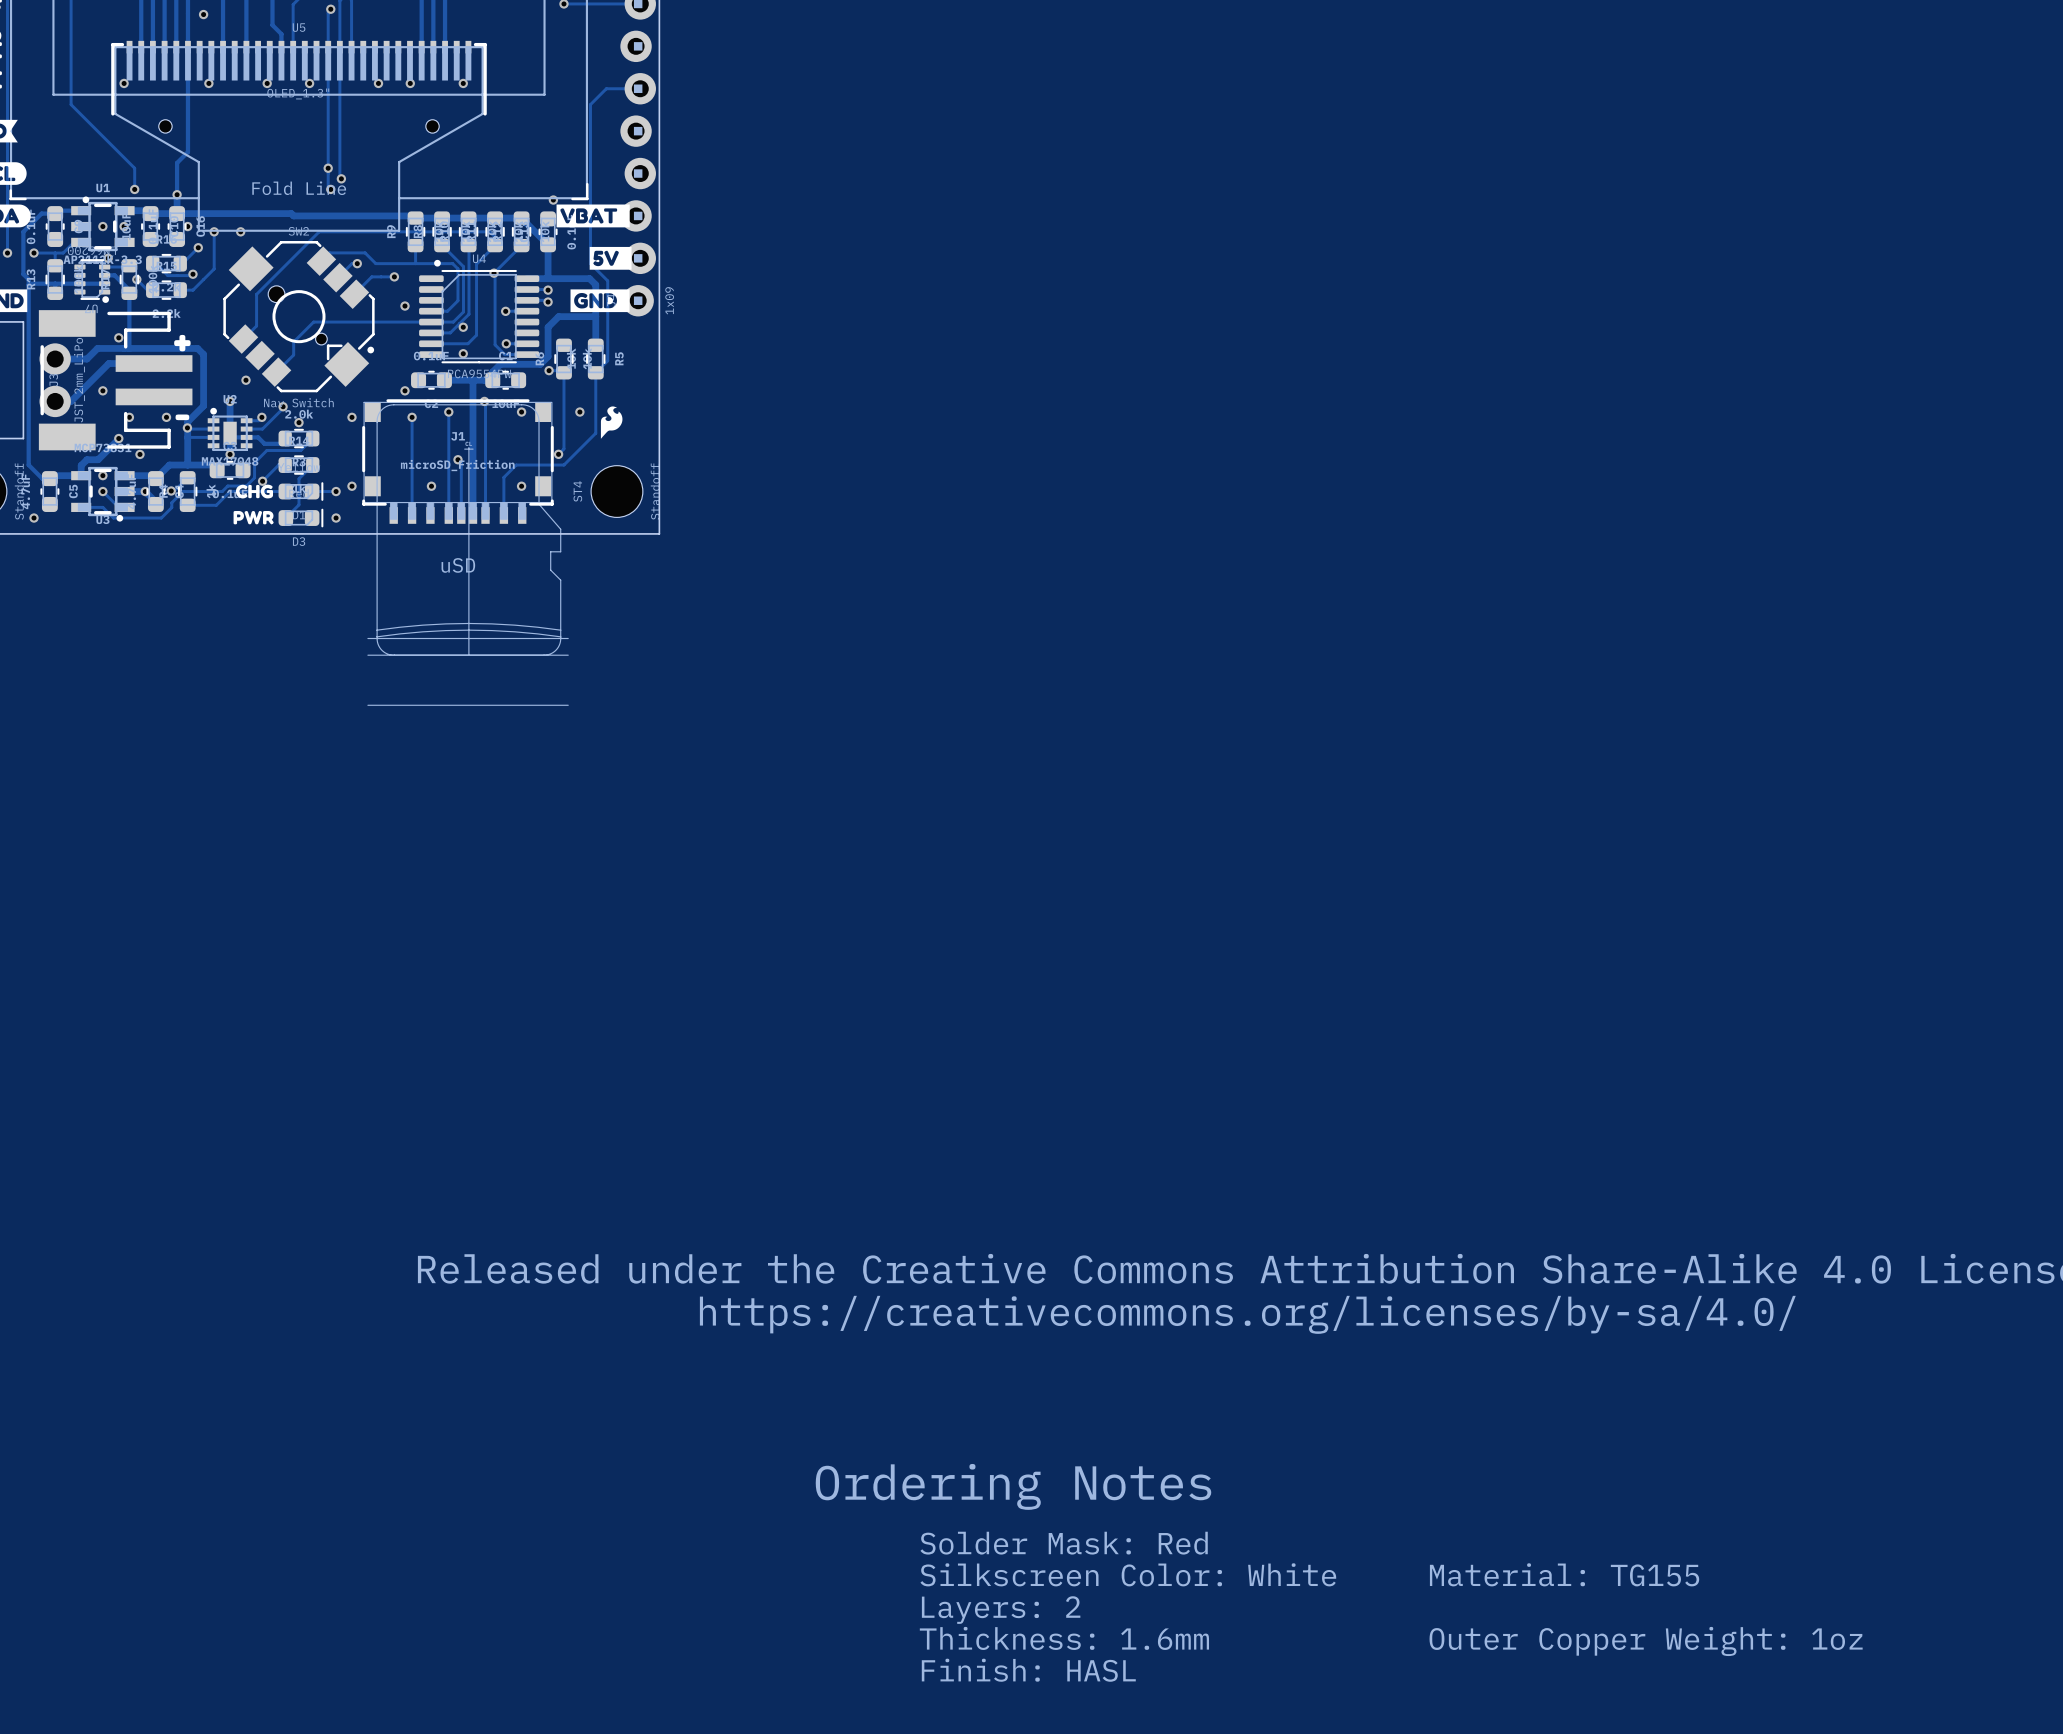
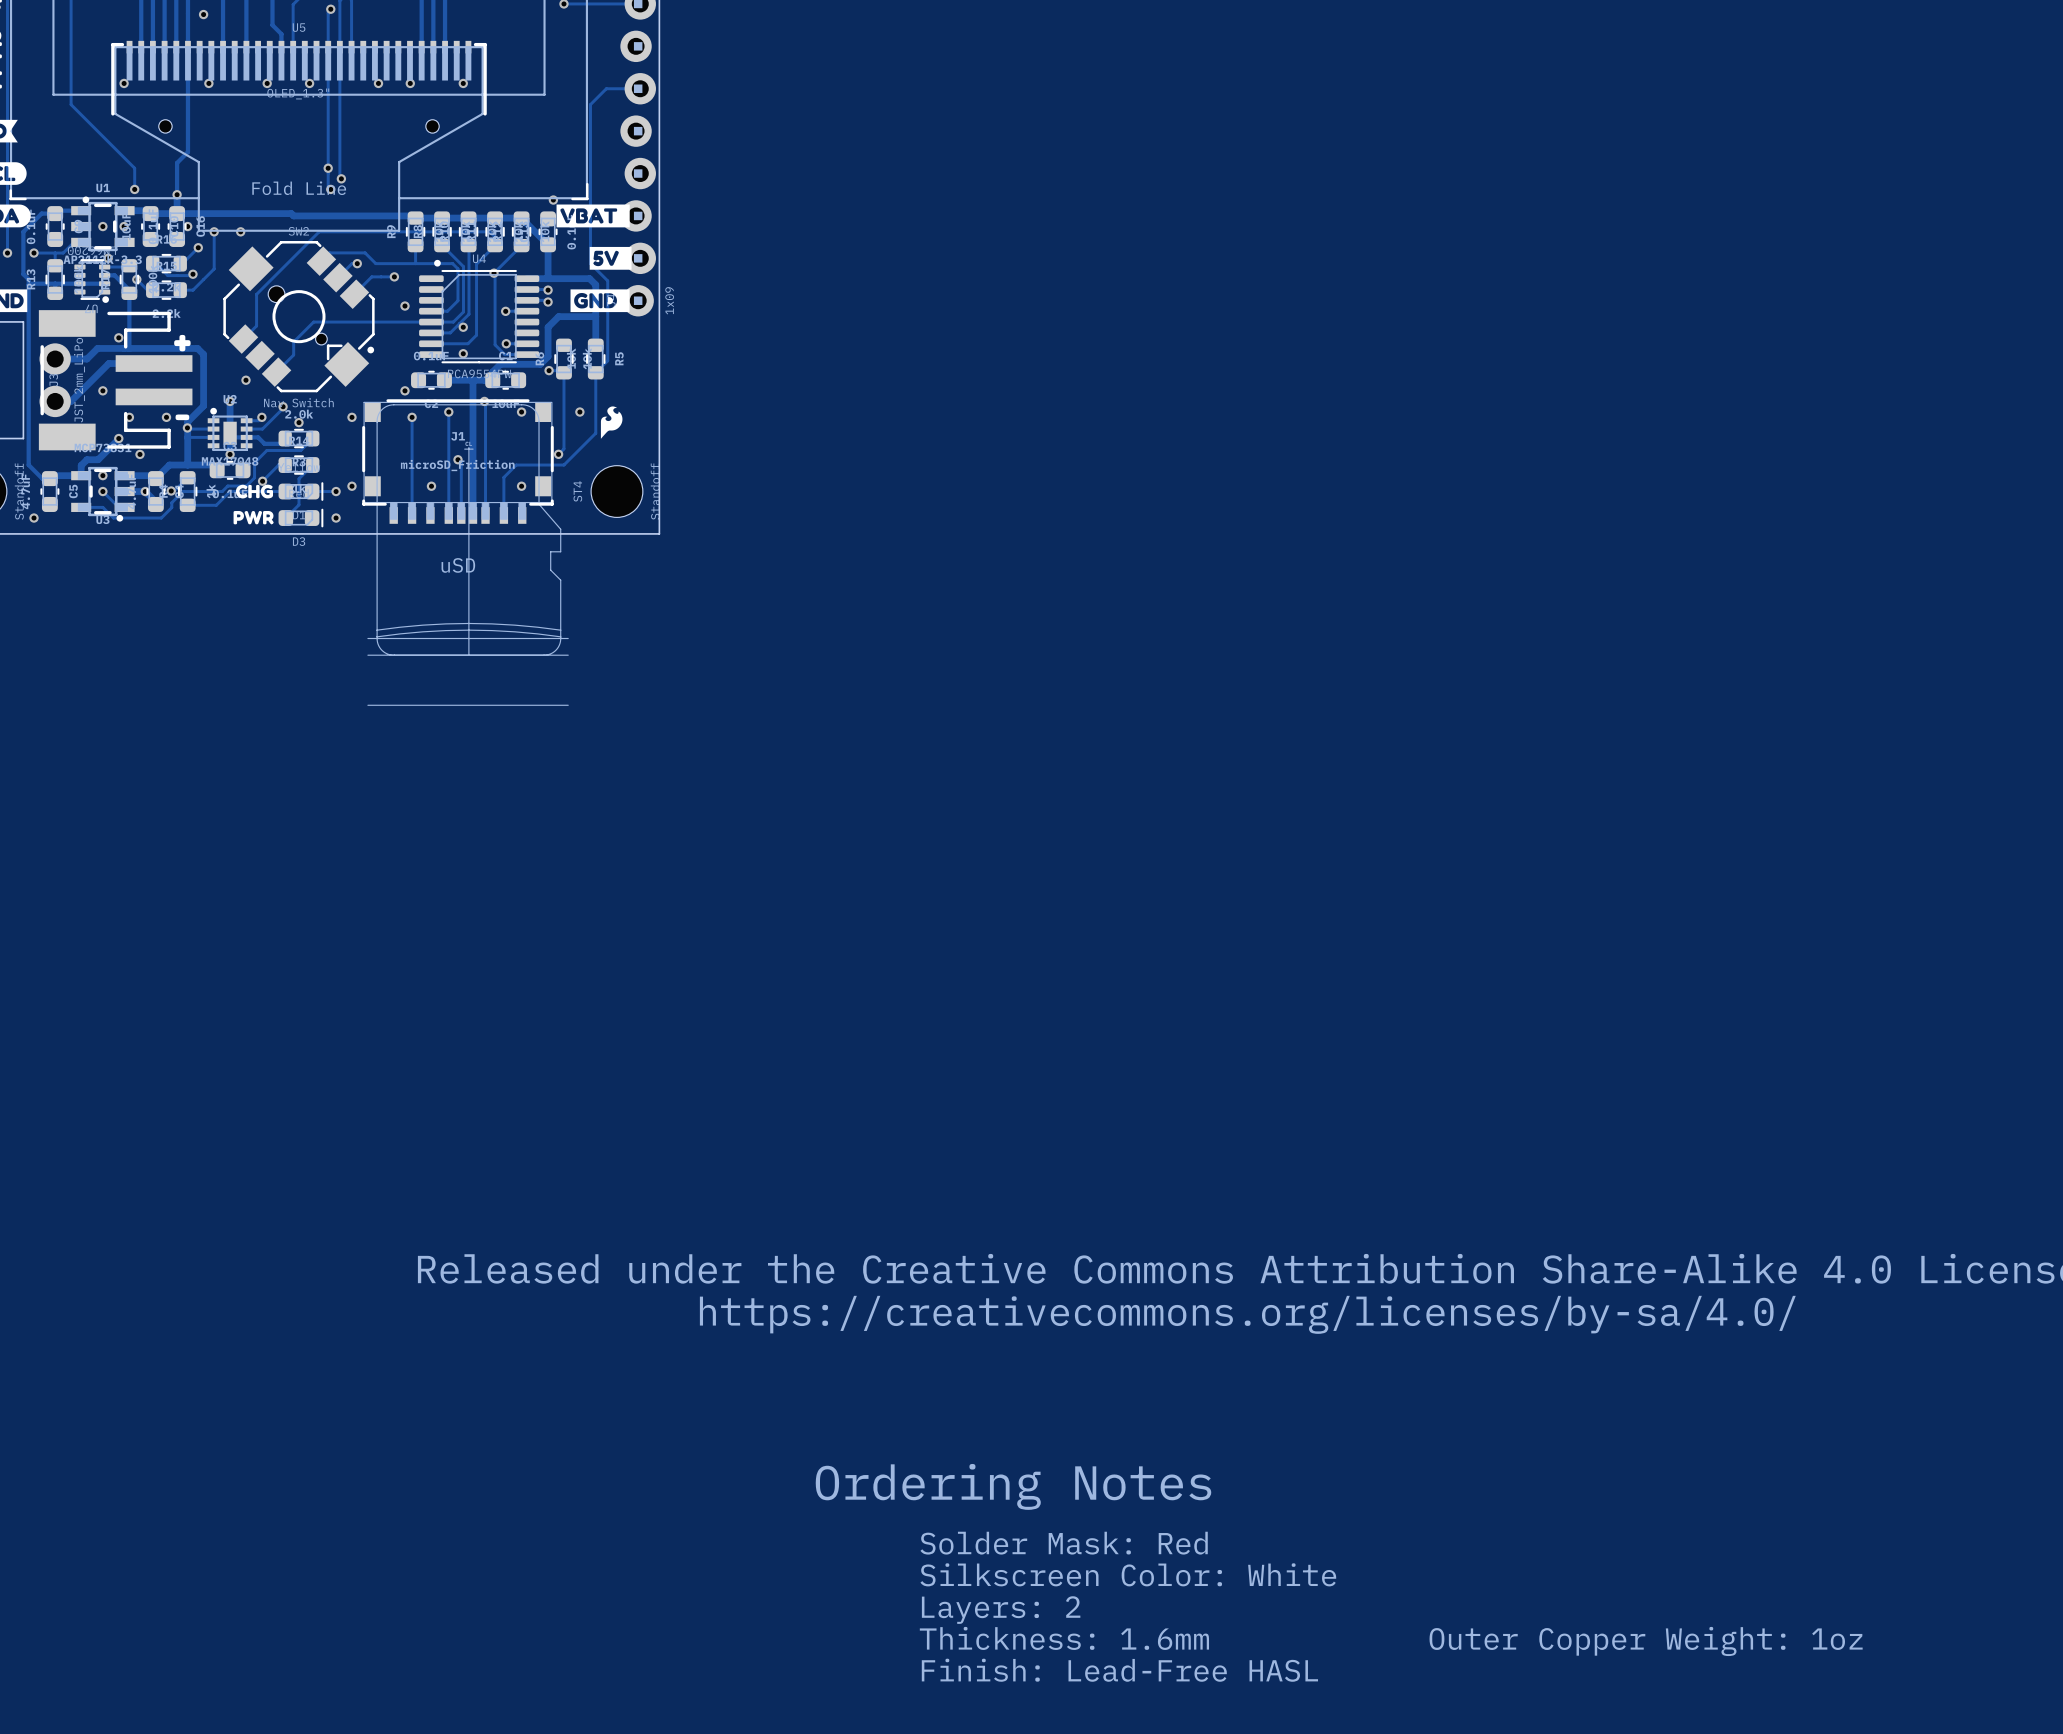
text: Material: TG155 (1564, 1574) -> none
text: Finish: HASL (1028, 1670) -> Finish: Lead-Free HASL (1119, 1670)

